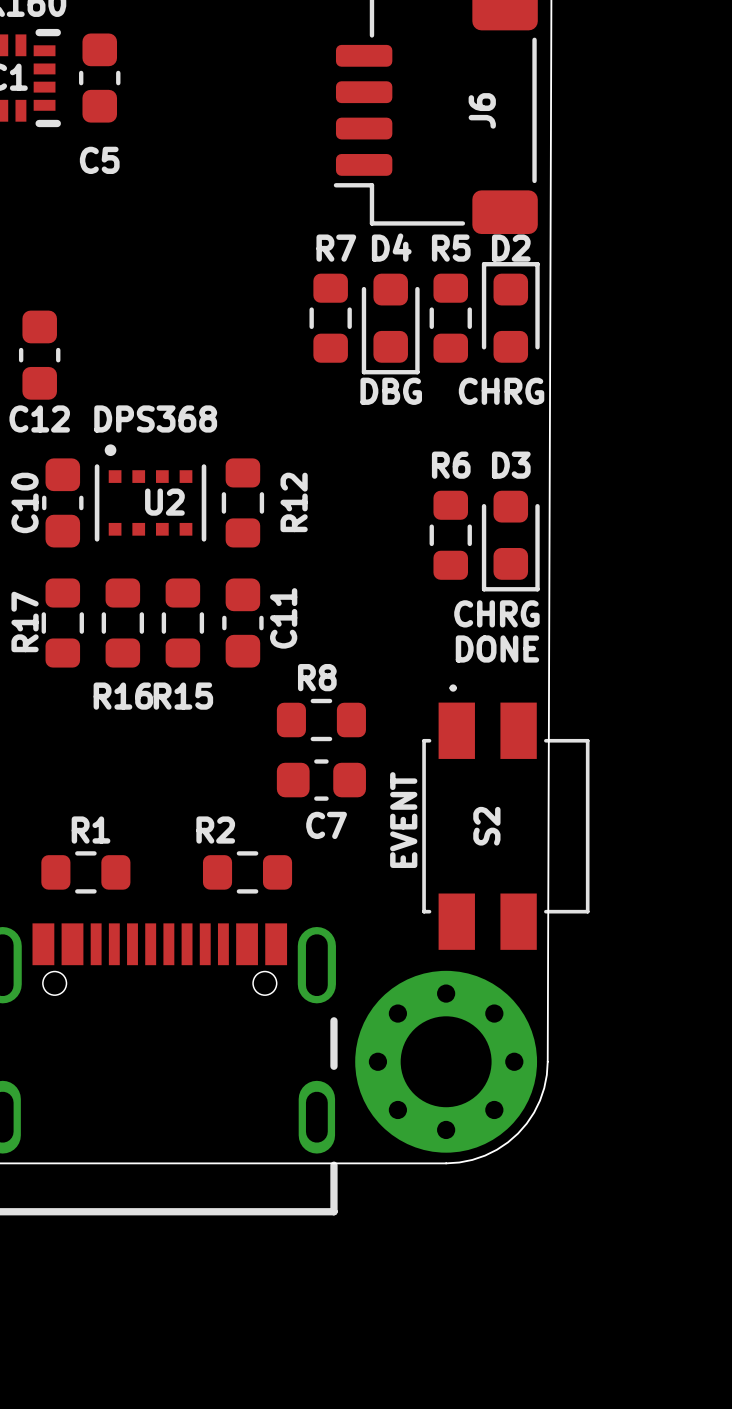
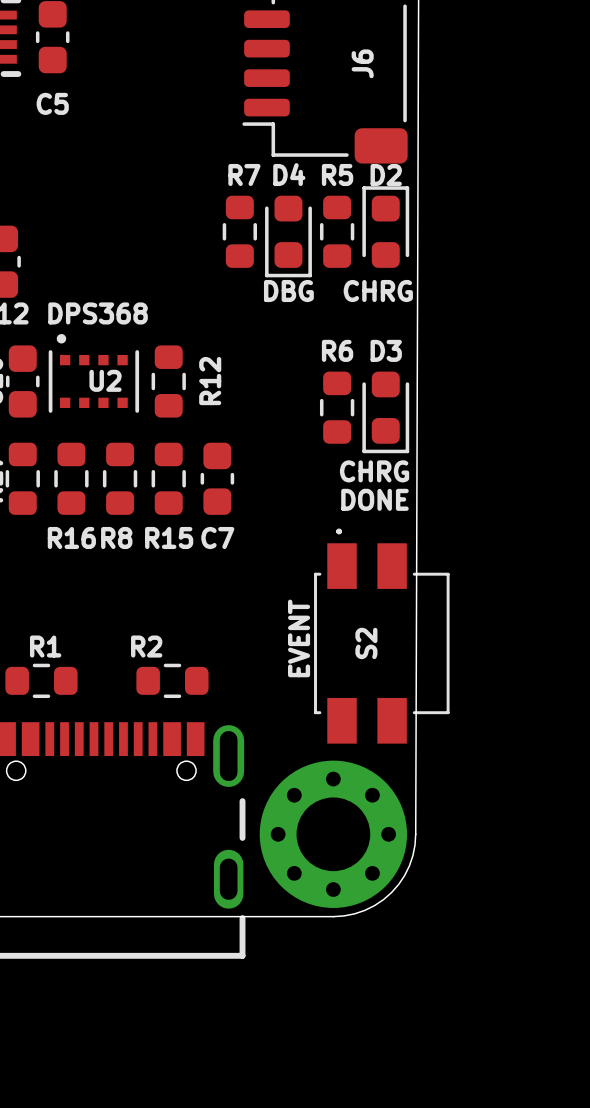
C11: (242, 623) -> none
R15: none -> (168, 478)
R15 name: R15 (183, 696) -> R8 (116, 538)
R8: (321, 720) -> none
C7 rotation: 0° (321, 780) -> 90° clockwise (217, 478)
C7 position: (321, 780) -> (217, 478)

